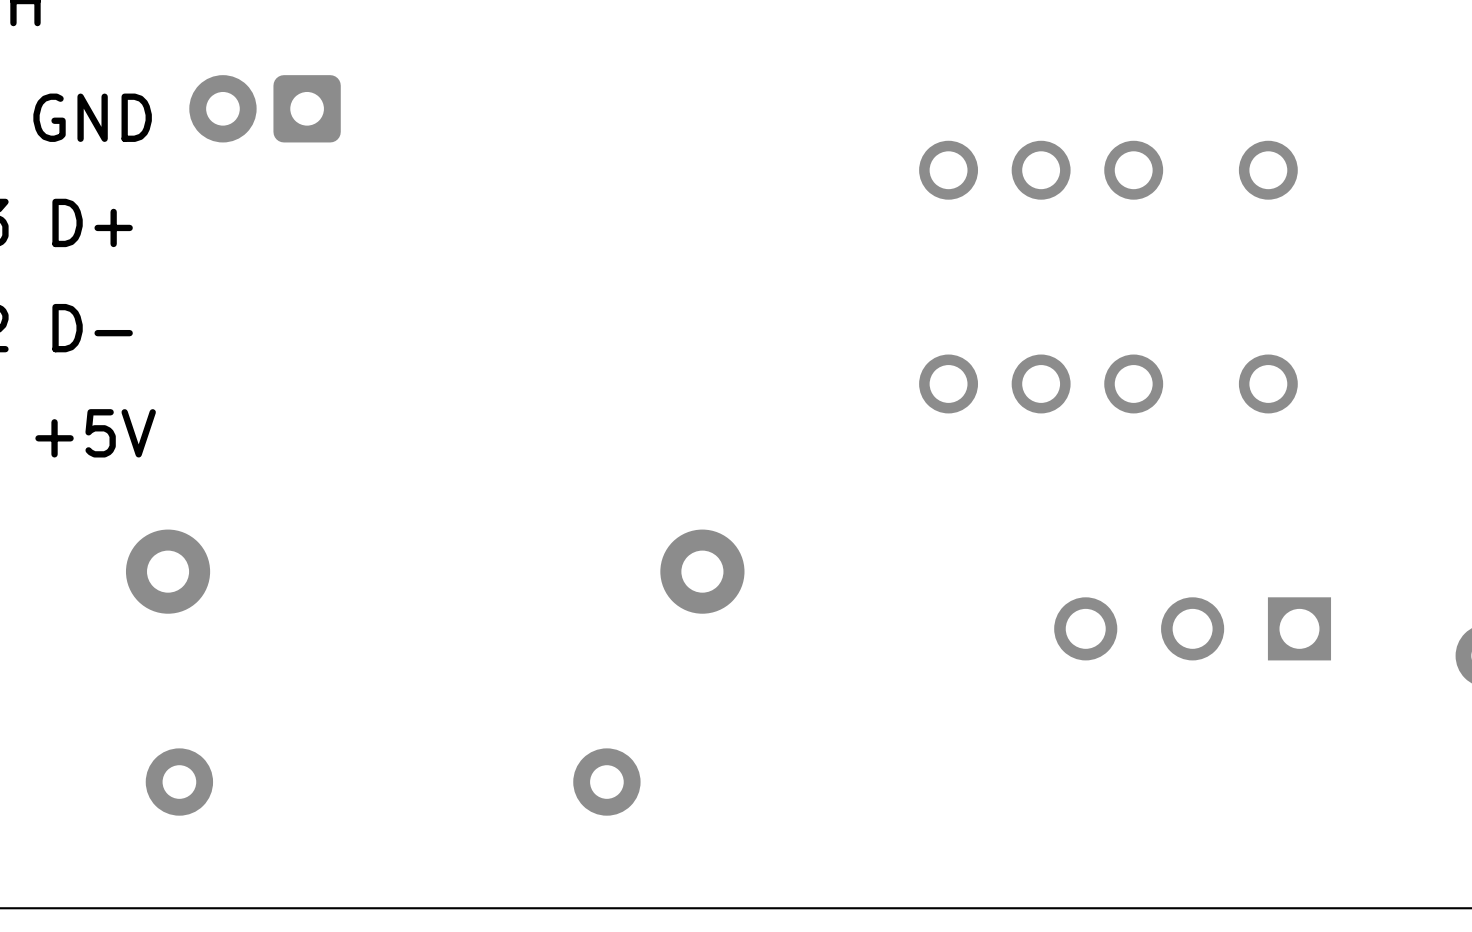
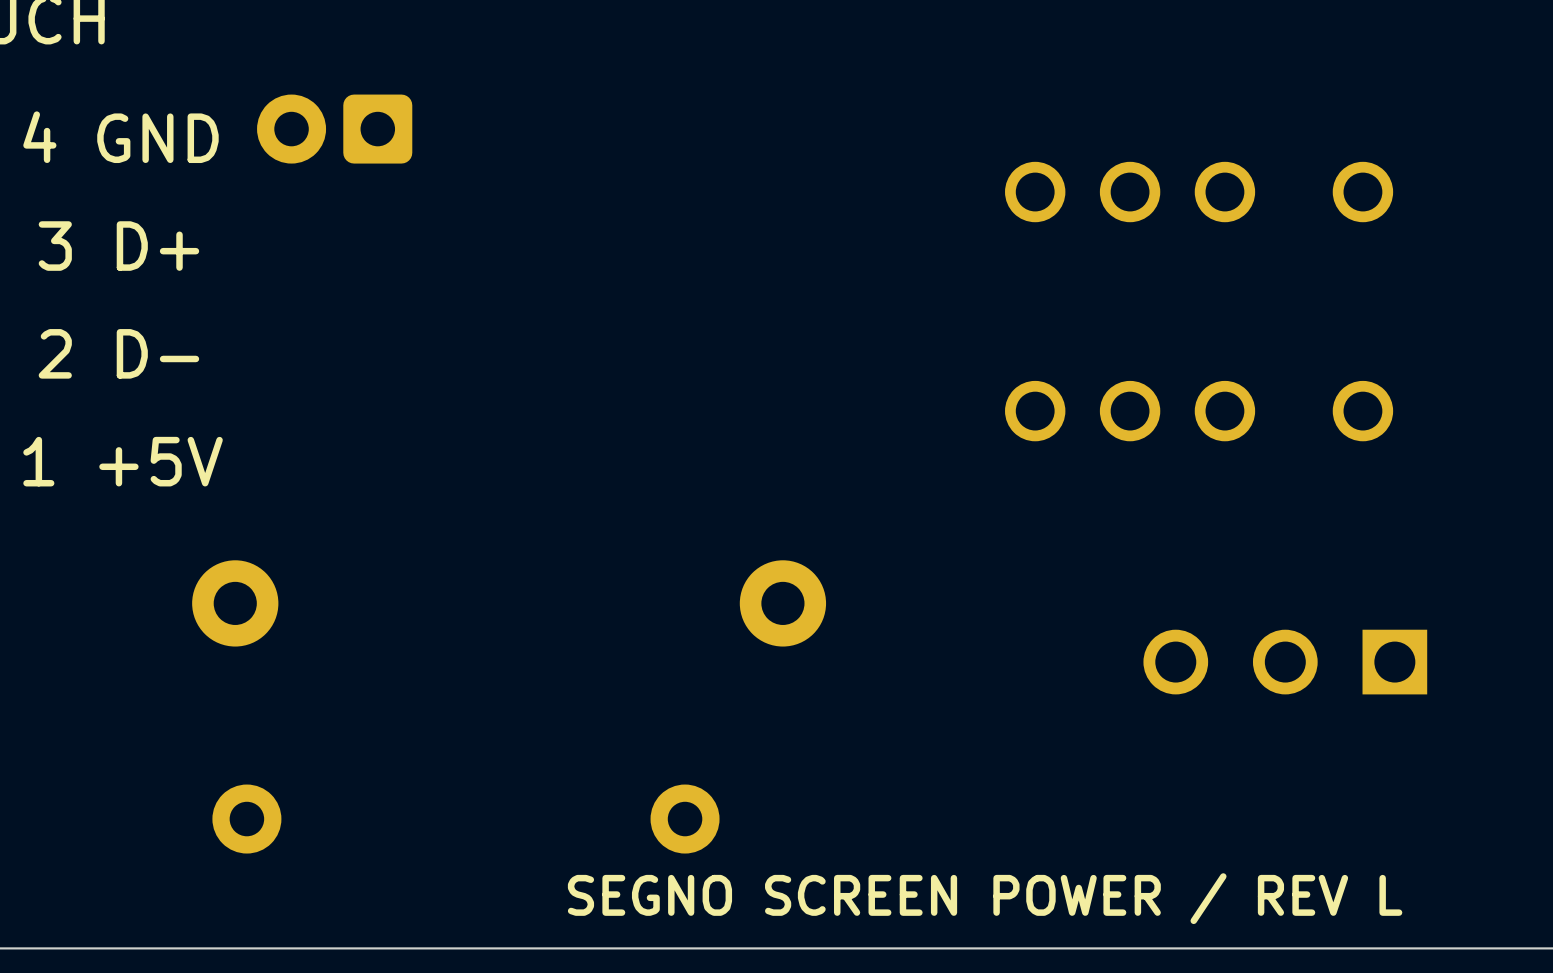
text: none -> SEGNO SCREEN POWER / REV L (985, 898)

